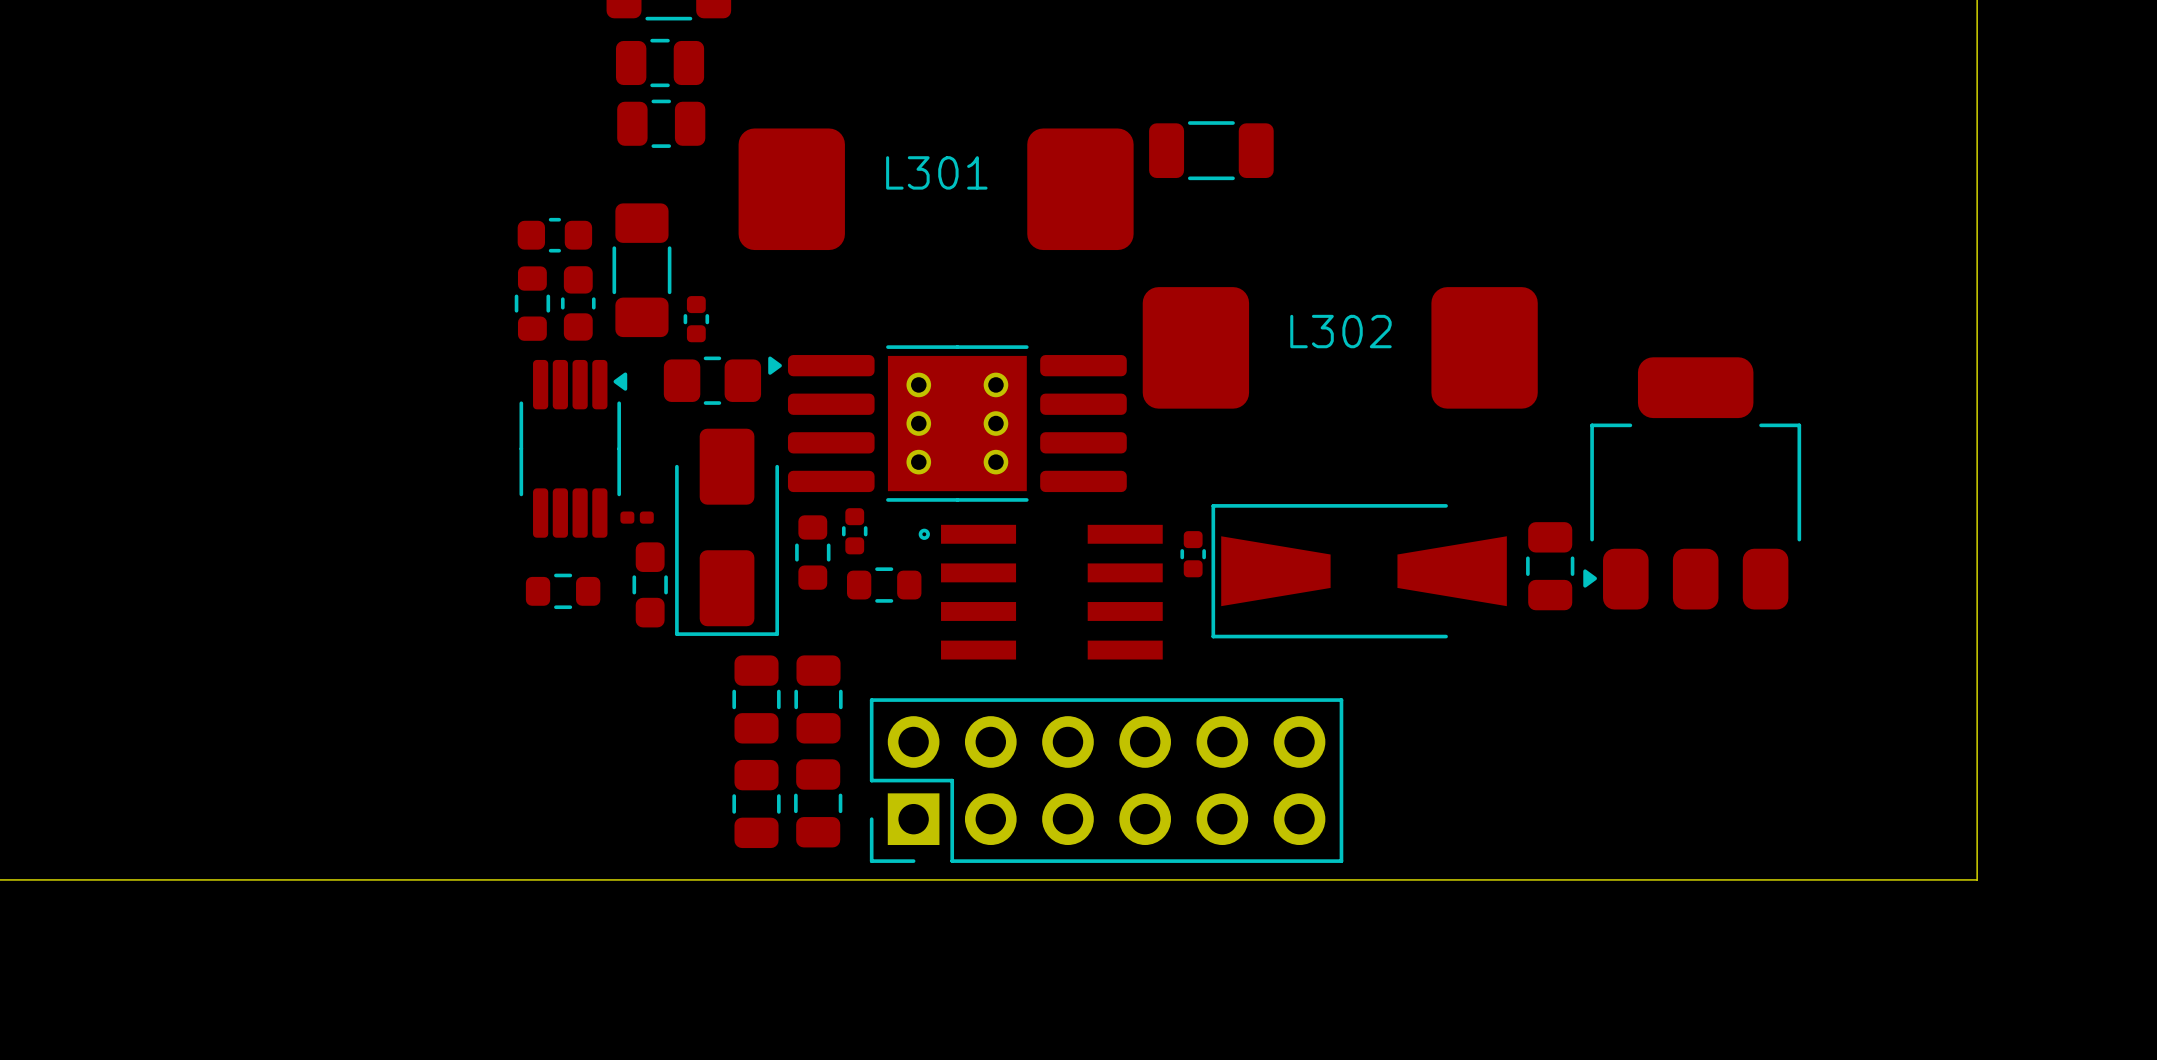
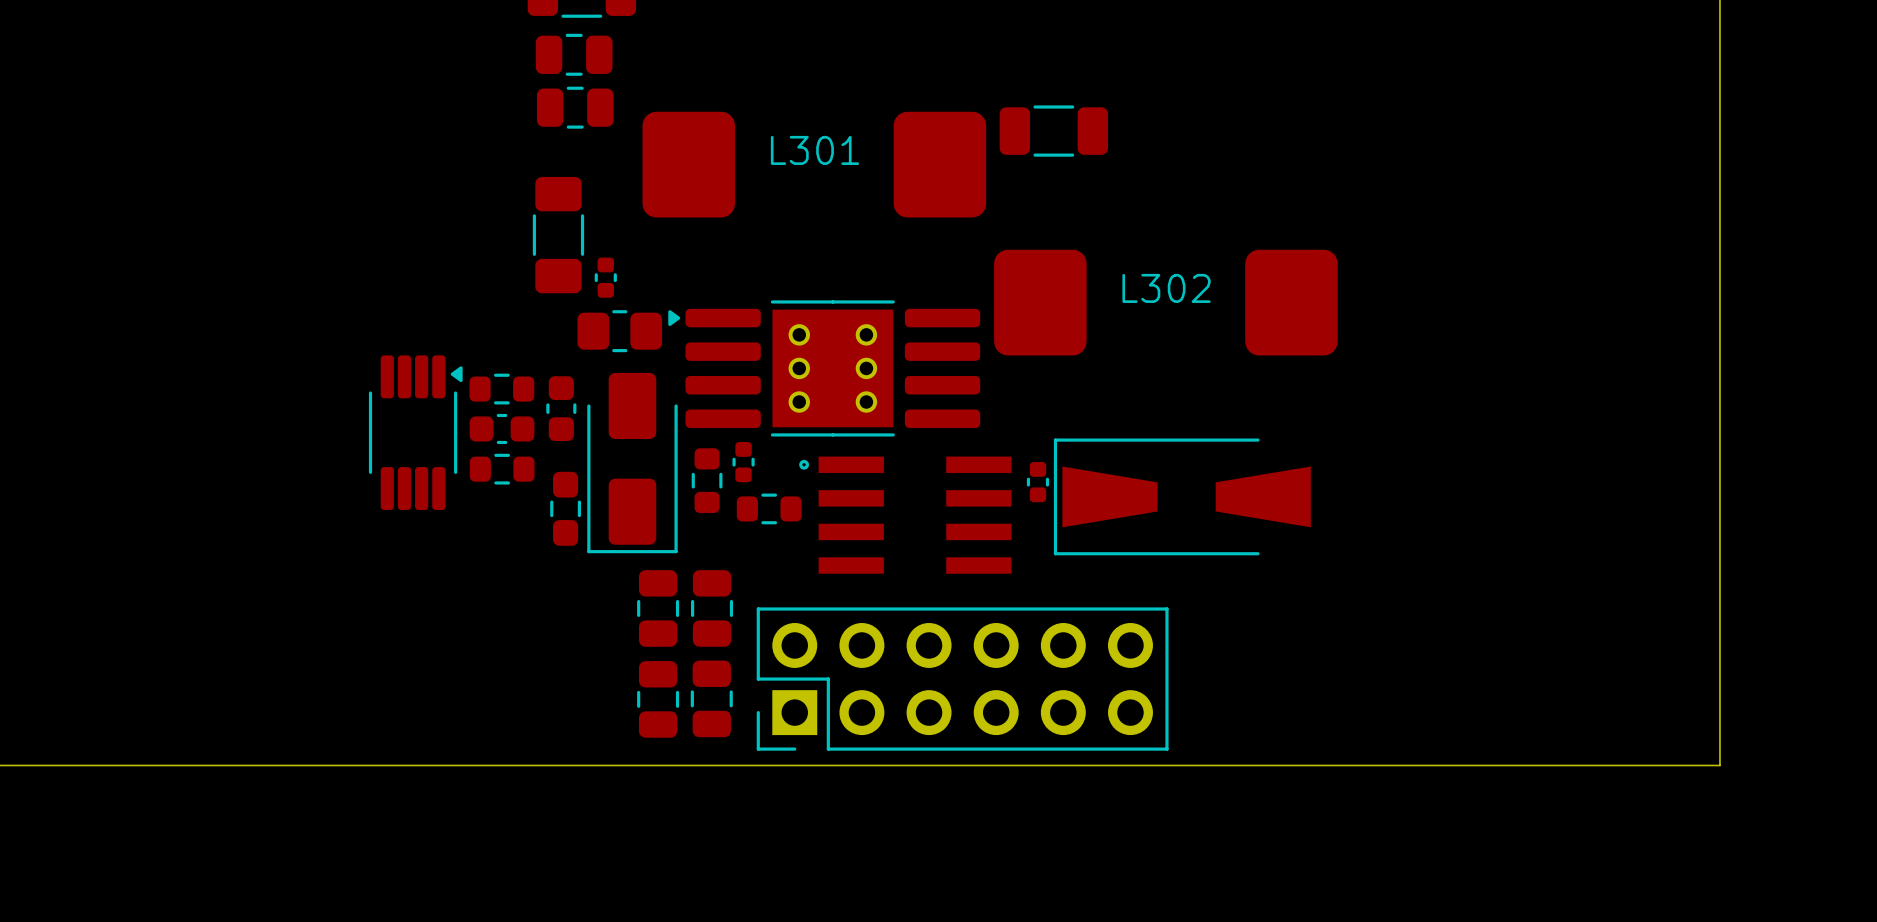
part: (554, 235) -> none
part: (532, 303) -> none
part: (578, 303) -> none
part footprint: [519, 359, 628, 538] -> [469, 373, 535, 405]
part: none -> (561, 408)
part: (1692, 483) -> none
part: none -> (502, 428)
part: none -> (415, 432)
part: (637, 517) -> none
part: (1550, 566) -> none
part position: (563, 591) -> (502, 469)

